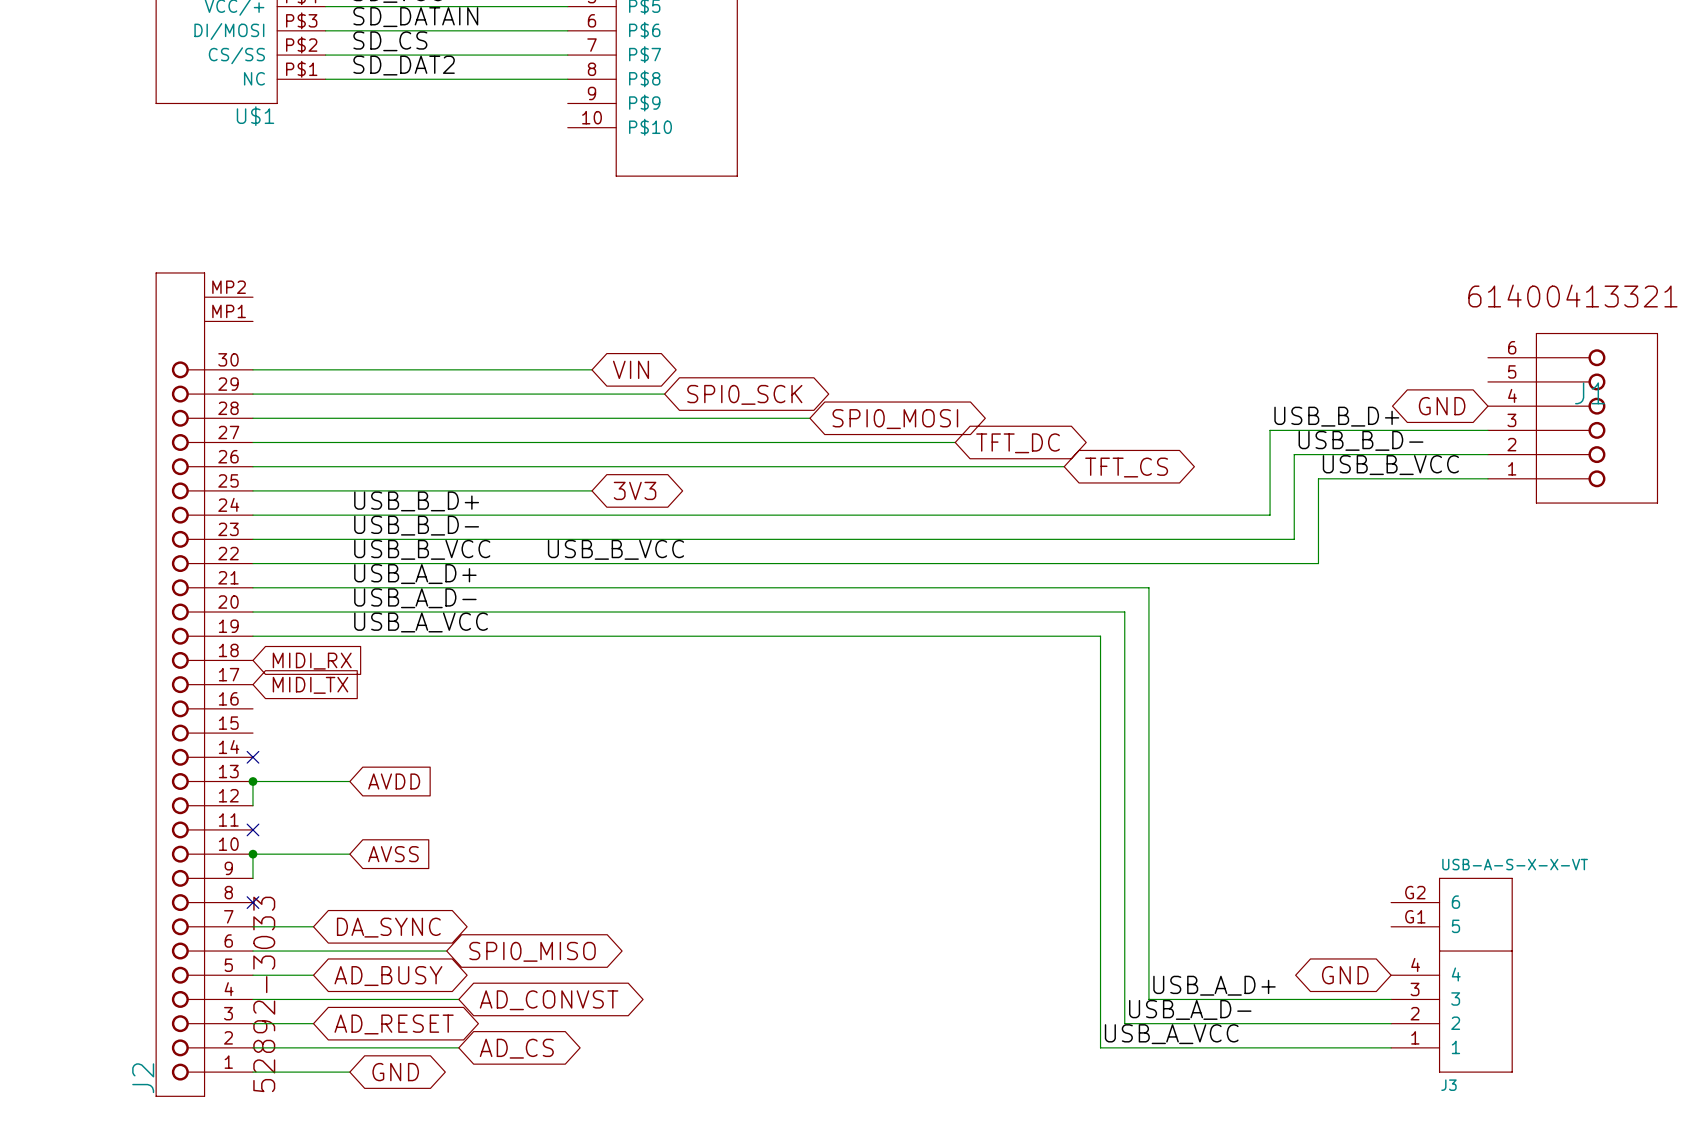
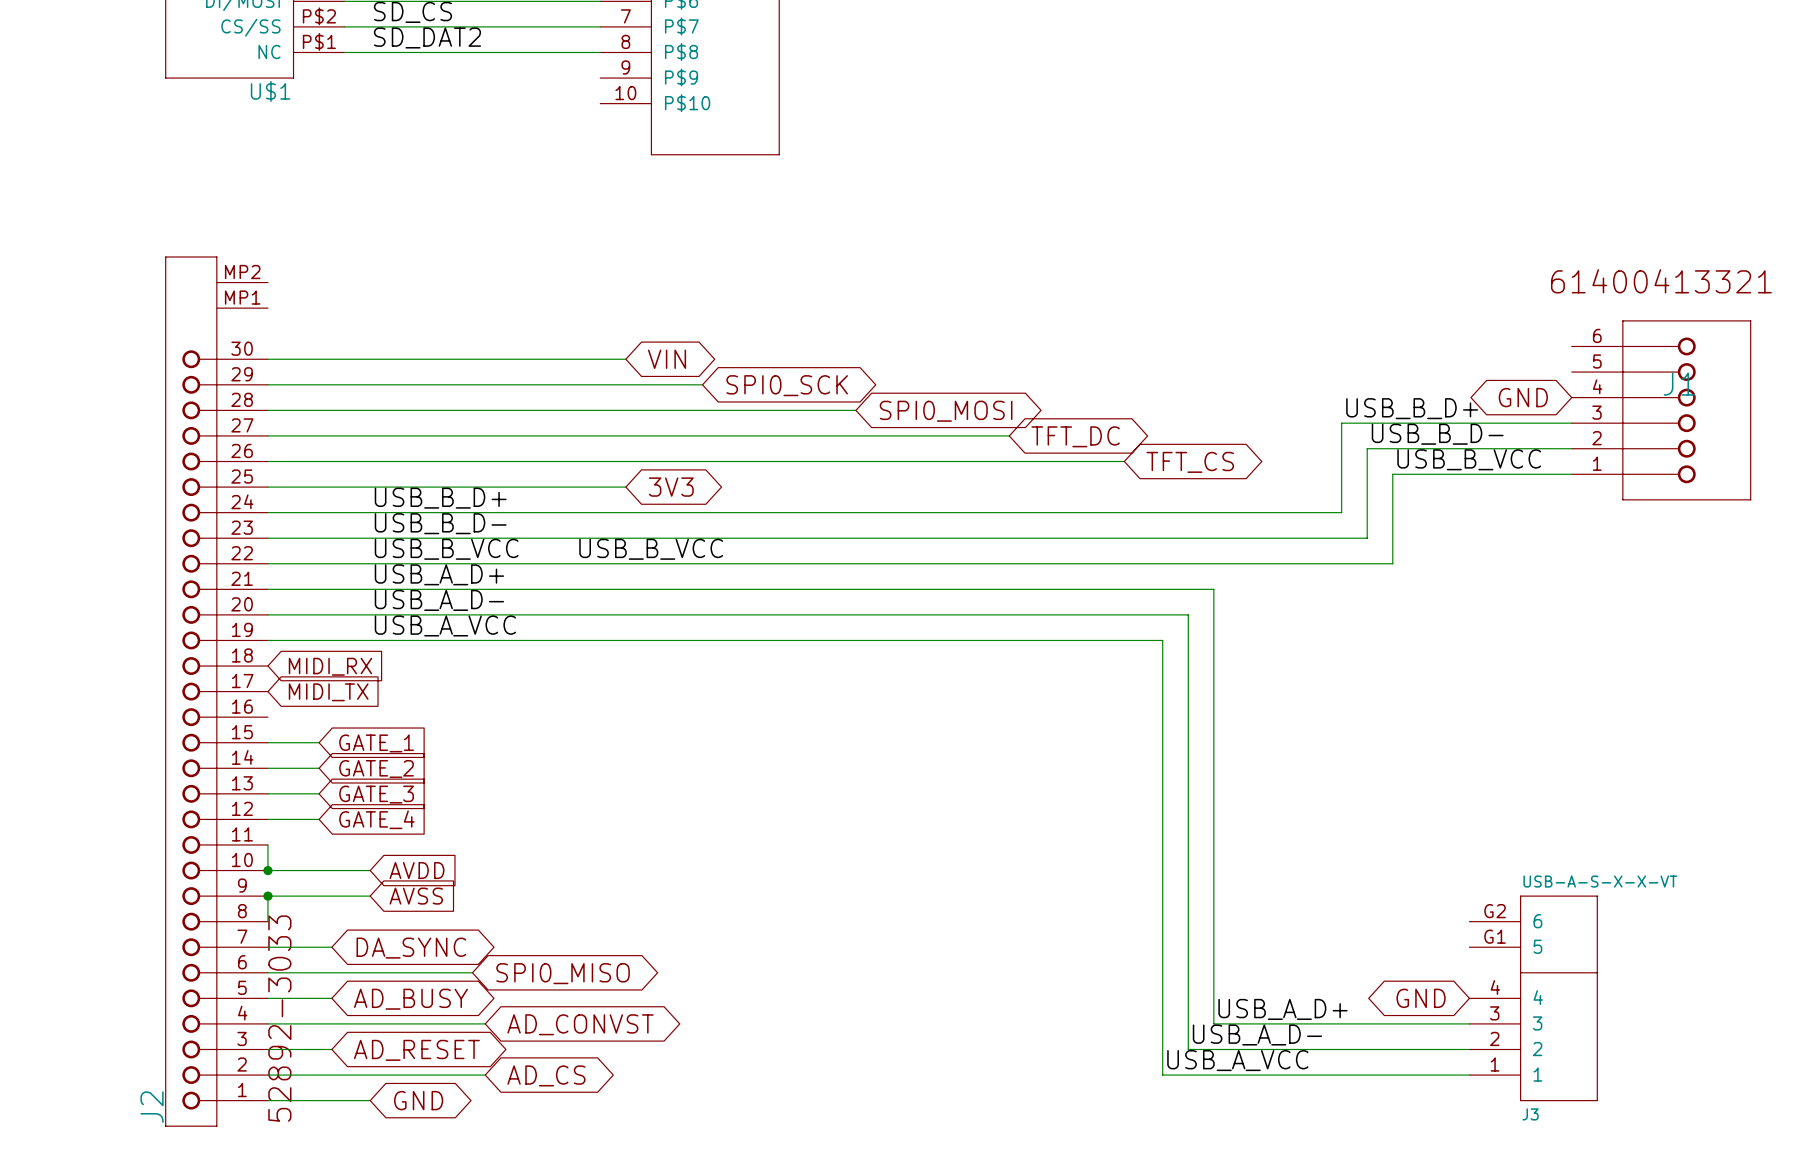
wire: none -> (267, 742) (319, 742)
global label: none -> GATE_1 (376, 743)
no-connect mark: (252, 757) -> none
global label: none -> GATE_2 (376, 769)
wire: (252, 781) (252, 805) -> (319, 819) (267, 819)
junction: (252, 781) -> none
wire: (301, 781) (349, 781) -> (267, 768) (319, 768)
global label: AVDD (394, 781) -> none
global label: none -> GATE_3 (376, 794)
global label: none -> GATE_4 (376, 819)
no-connect mark: (252, 829) -> none
wire: (252, 854) (252, 878) -> (267, 870) (267, 844)
global label: AVSS (393, 854) -> AVDD (416, 870)
junction: none -> (267, 896)
wire: none -> (370, 896) (267, 896) (267, 921)
global label: none -> AVSS (416, 896)
no-connect mark: (252, 902) -> none

